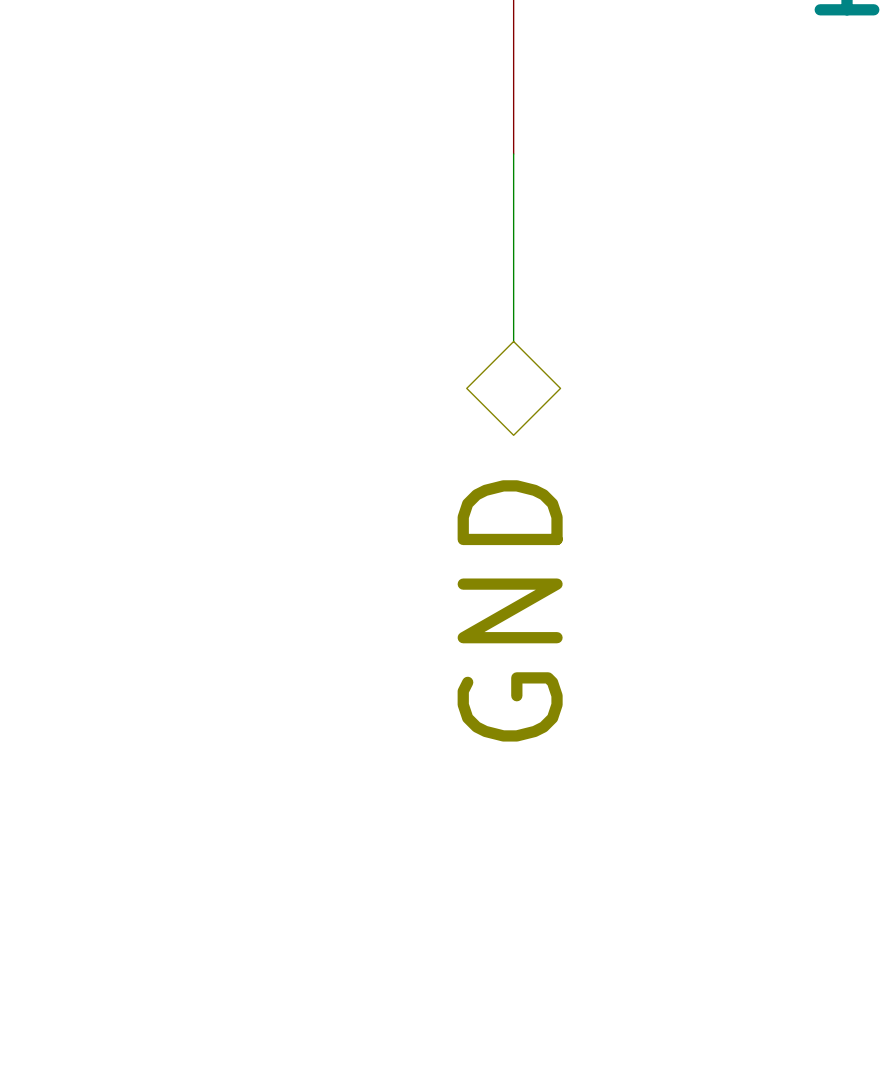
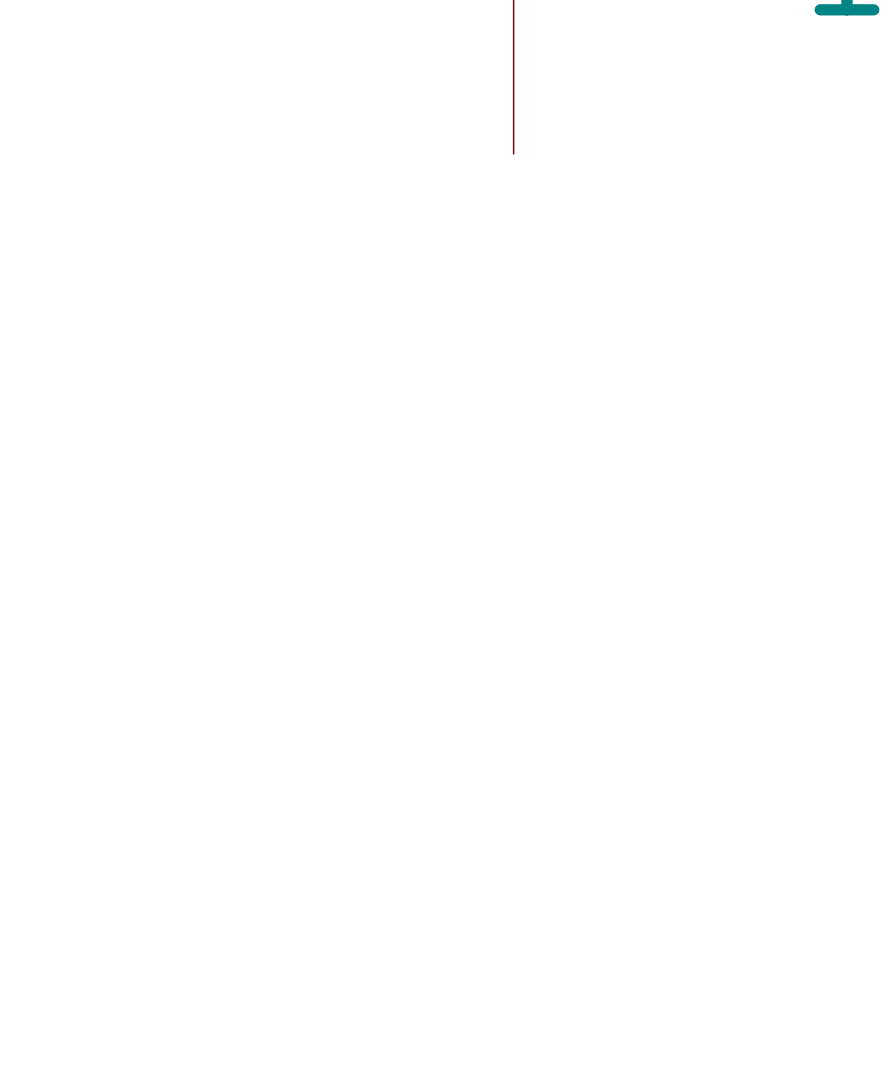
wire: (513, 153) (513, 341) -> none
hierarchical label: GND (510, 610) -> none

